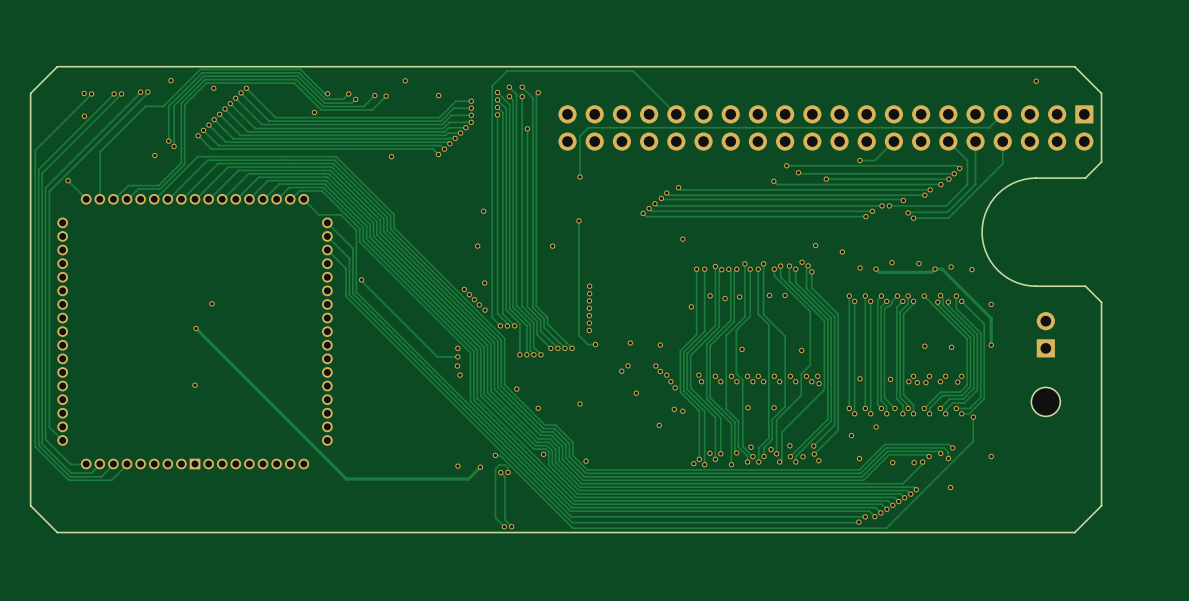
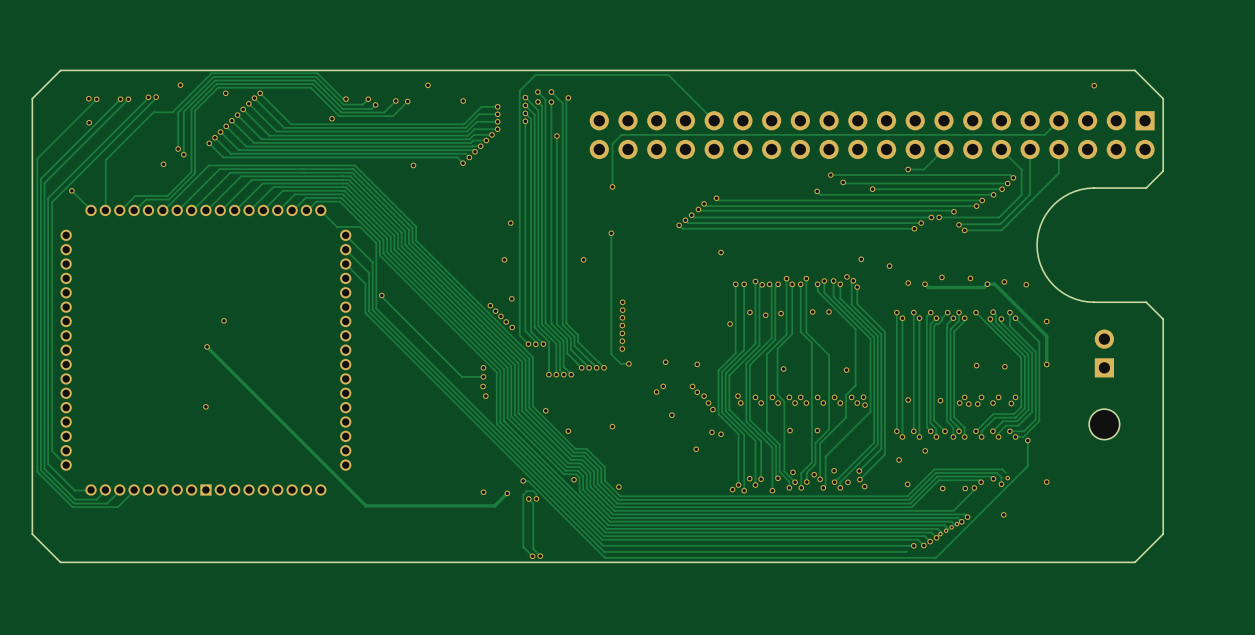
via: (952, 447) -> none
via: none -> (1007, 478)
via: none -> (957, 524)
via: (904, 497) -> none
via: none -> (951, 527)
via: (898, 501) -> none
via: none -> (946, 530)
via: none -> (940, 534)
via: (892, 505) -> none
via: (858, 522) -> none

